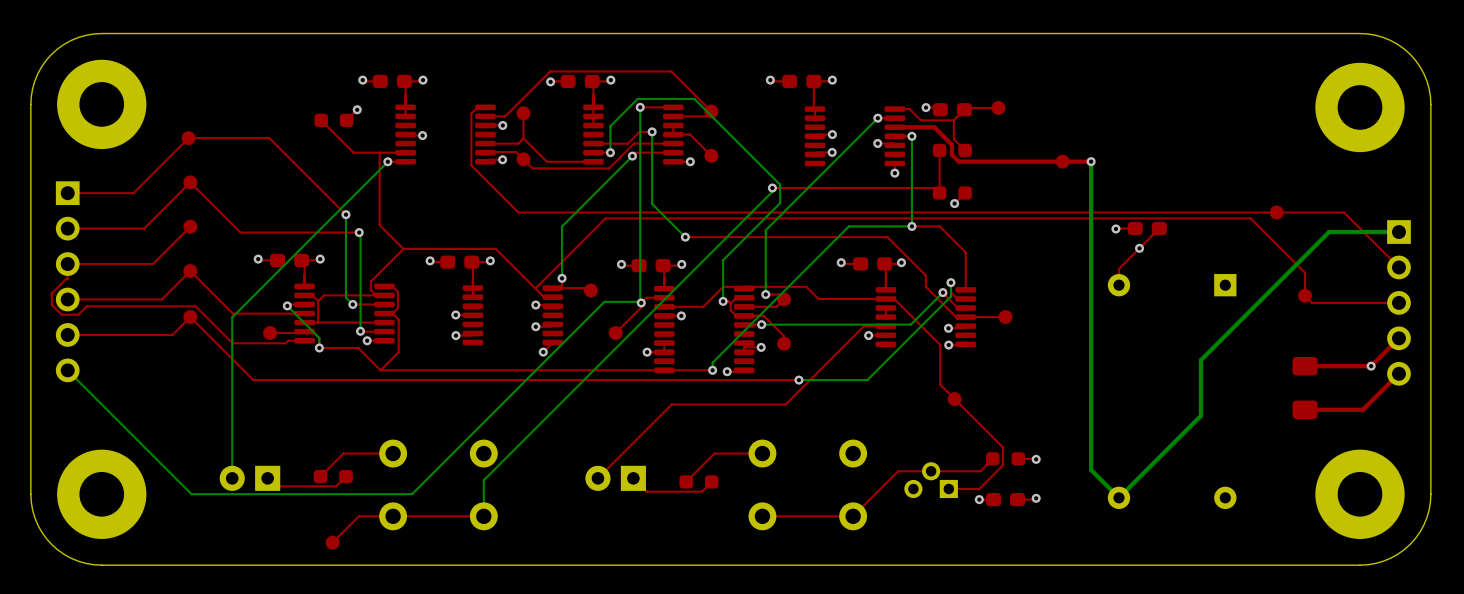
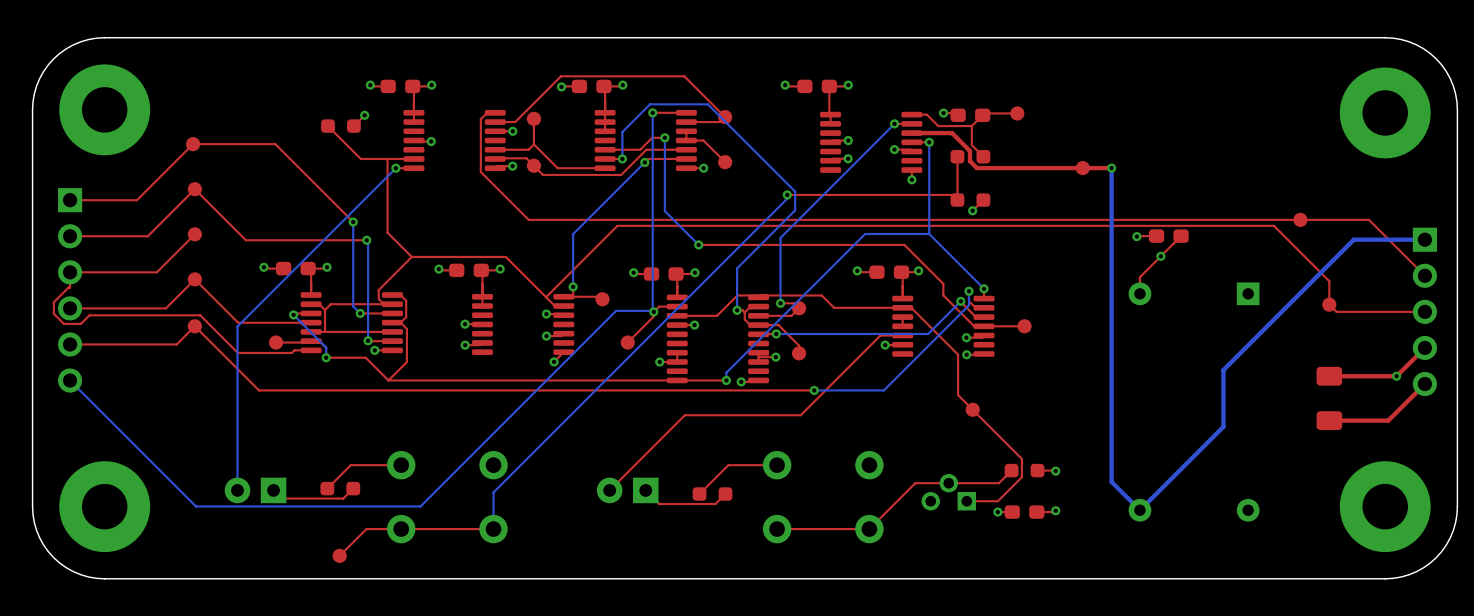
top track: (911, 226) (939, 226) (965, 252) (965, 280) -> none
bottom track: none -> (929, 234) (984, 288)
via position: (911, 226) -> (984, 288)

